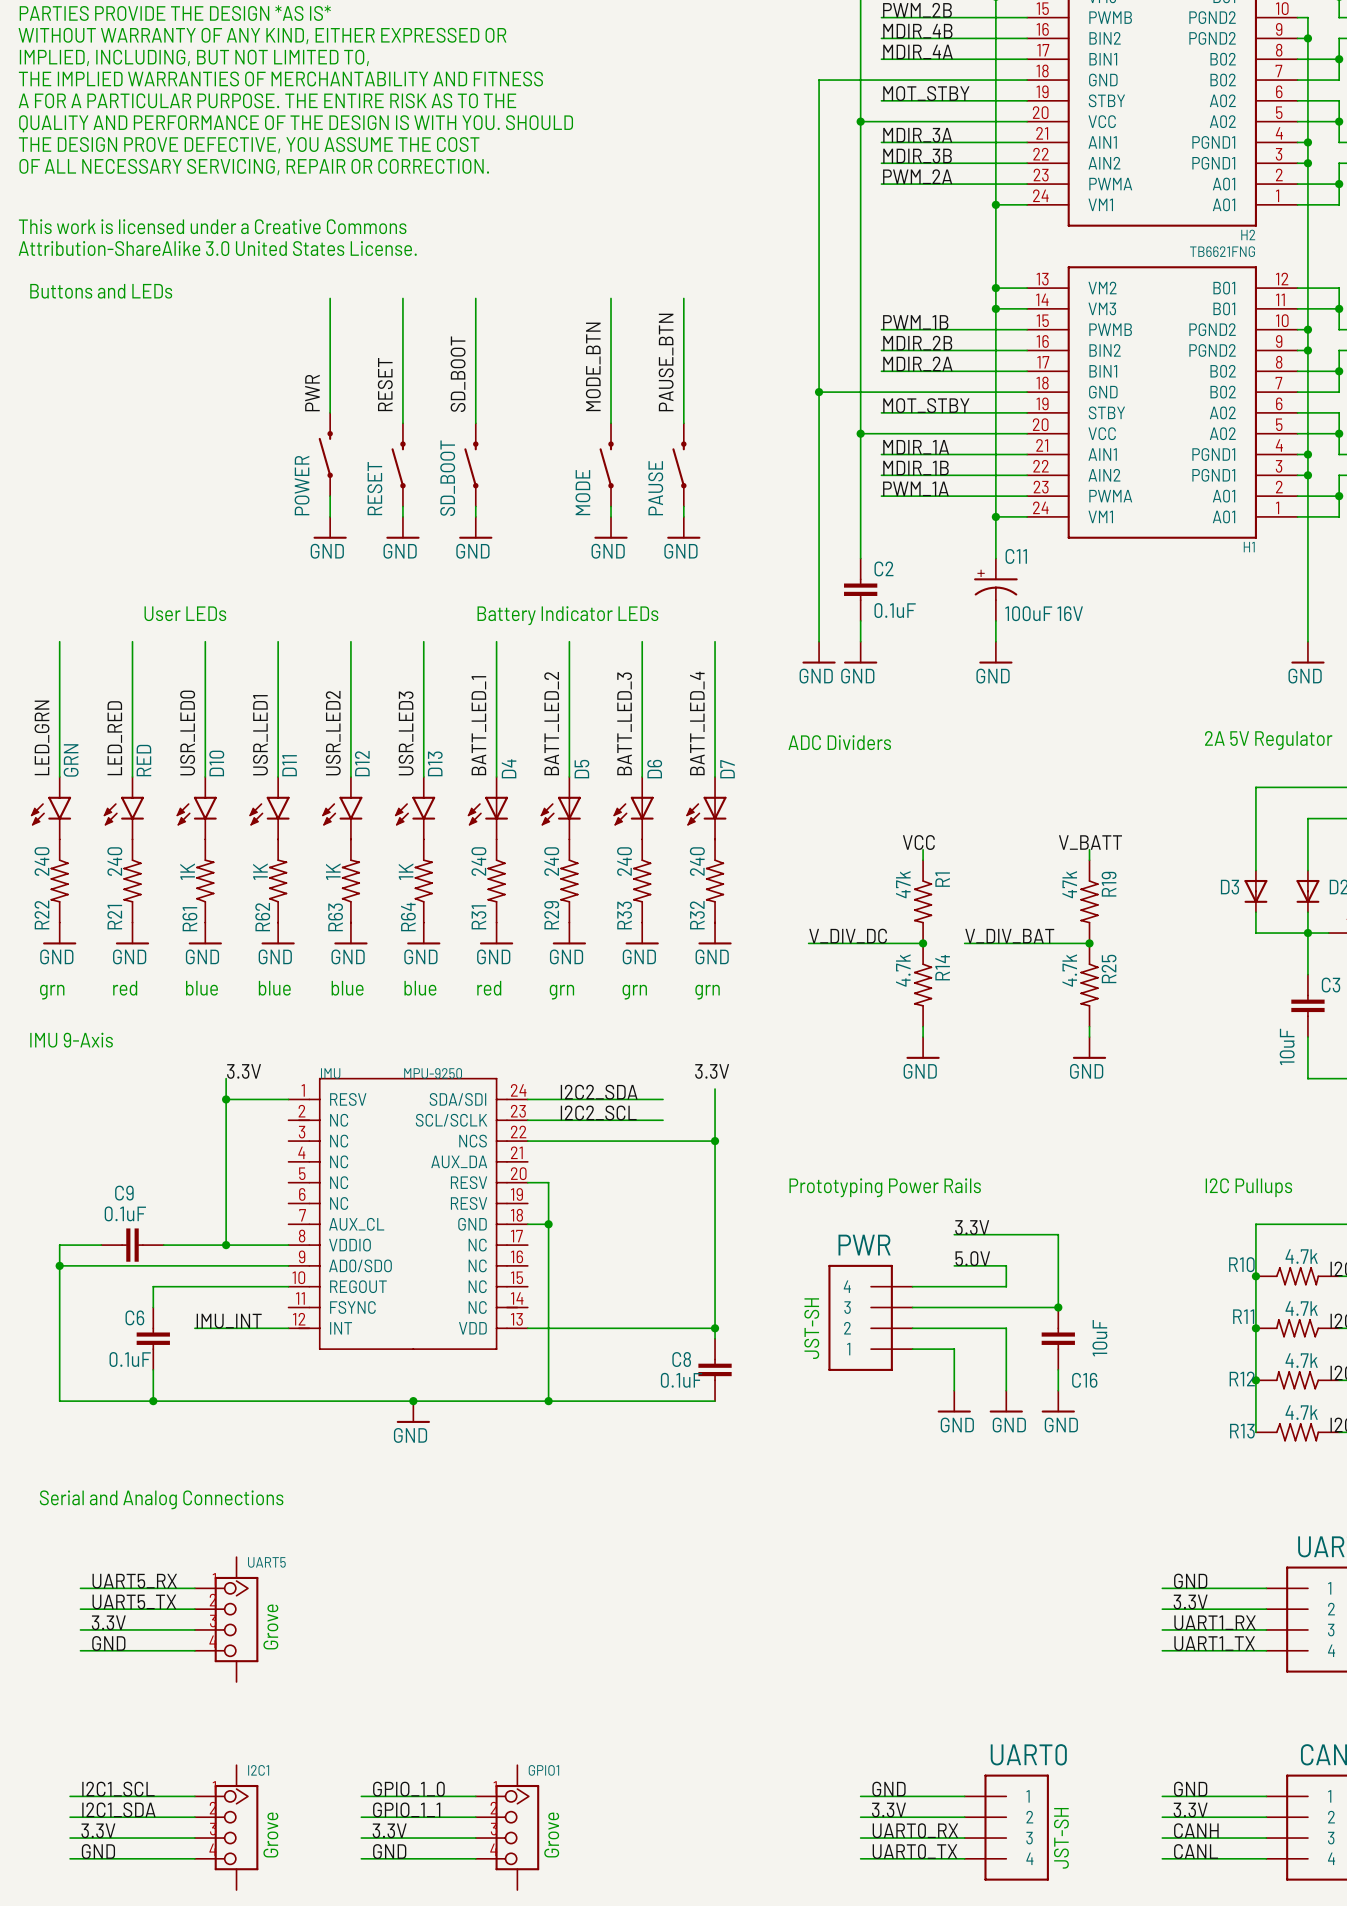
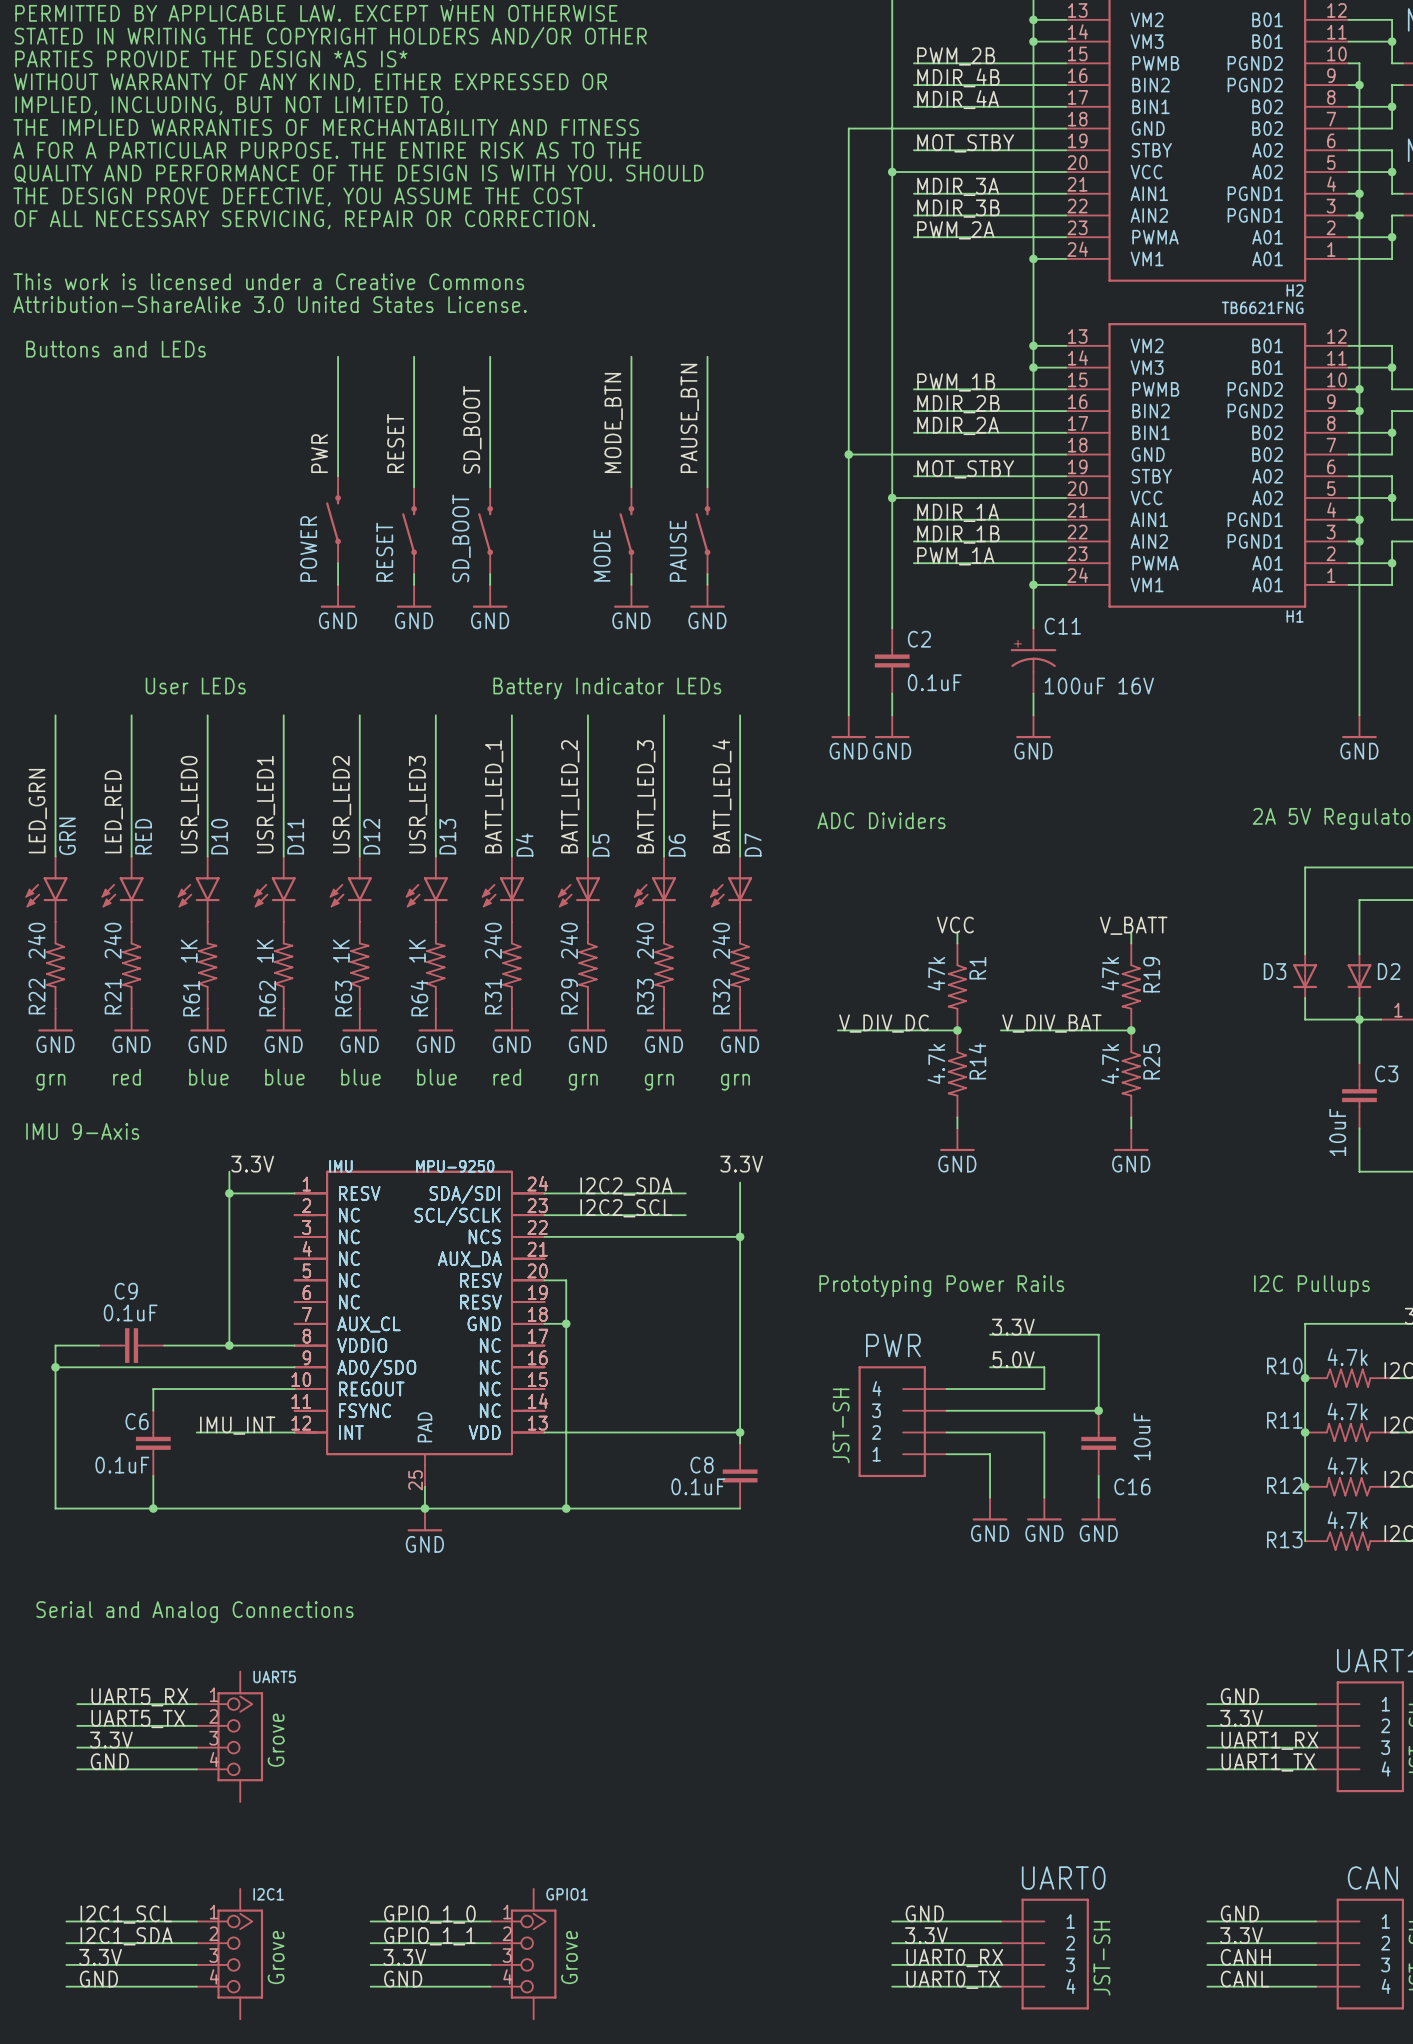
IMU: none -> MPU-9250 (419, 1328)
wire: none -> (424, 1486) (424, 1508)

